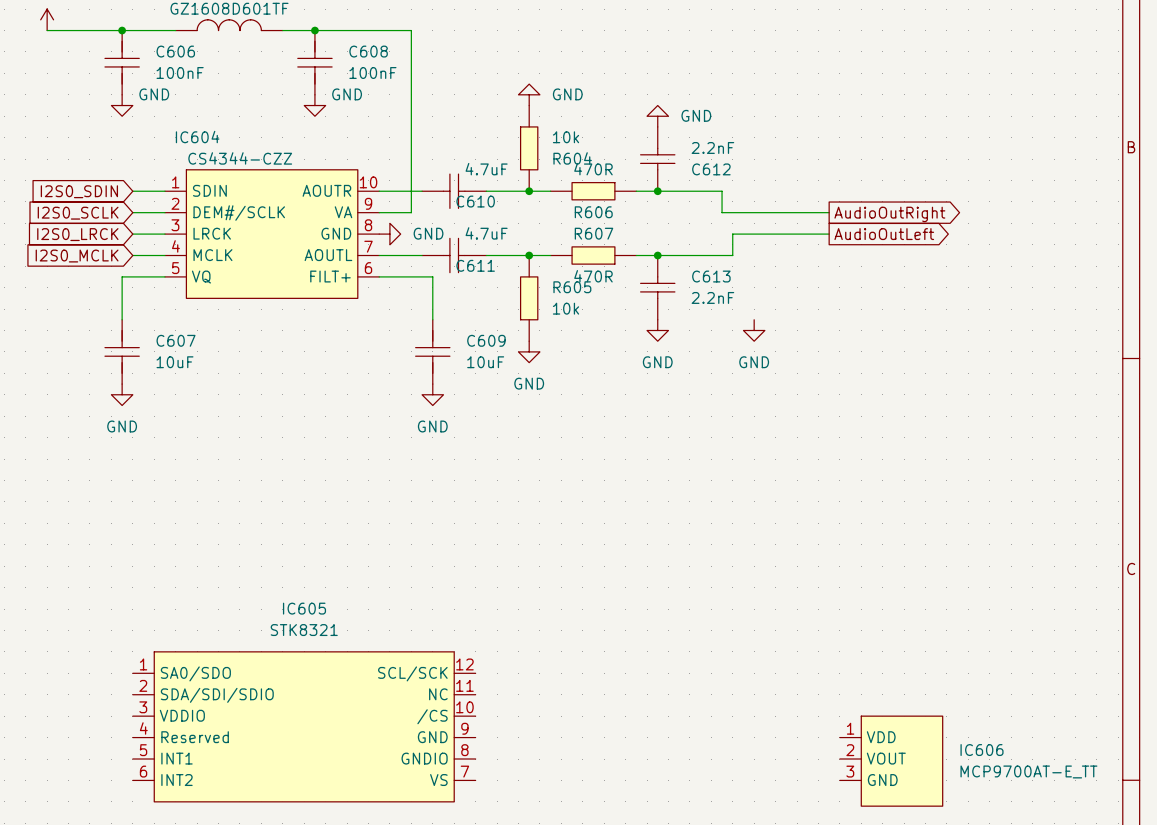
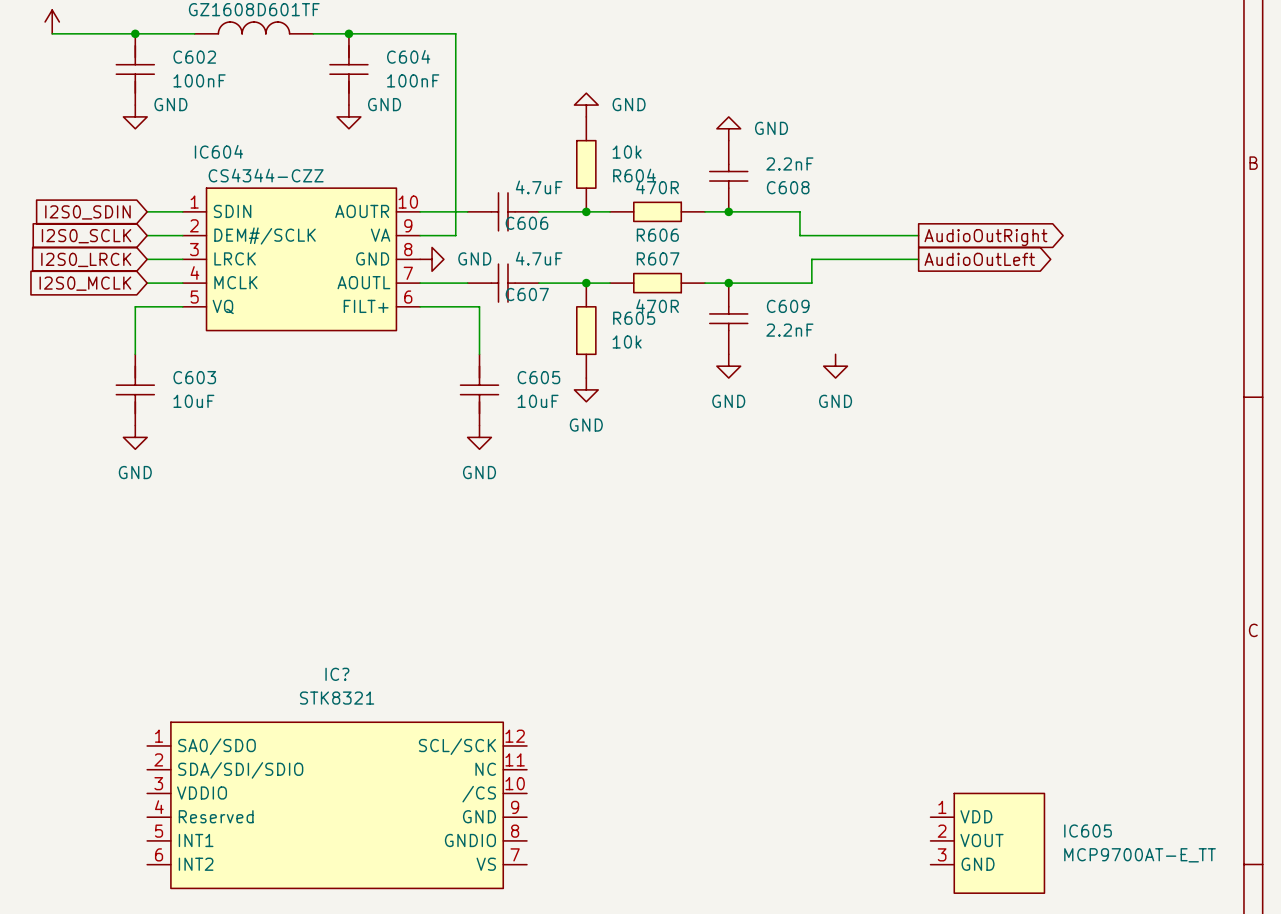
C606 name: C606 (175, 51) -> C602 (194, 57)
C608 name: C608 (368, 51) -> C604 (408, 56)
C612 name: C612 (711, 169) -> C608 (788, 187)
C610 name: C610 (475, 201) -> C606 (526, 223)
C611 name: C611 (475, 265) -> C607 (527, 294)
C613 name: C613 (711, 276) -> C609 (788, 306)
C607 name: C607 (176, 340) -> C603 (194, 377)
C609 name: C609 (486, 340) -> C605 (538, 377)
IC605 name: IC605 (304, 608) -> IC? (337, 674)
IC606 name: IC606 (982, 750) -> IC605 (1088, 831)

